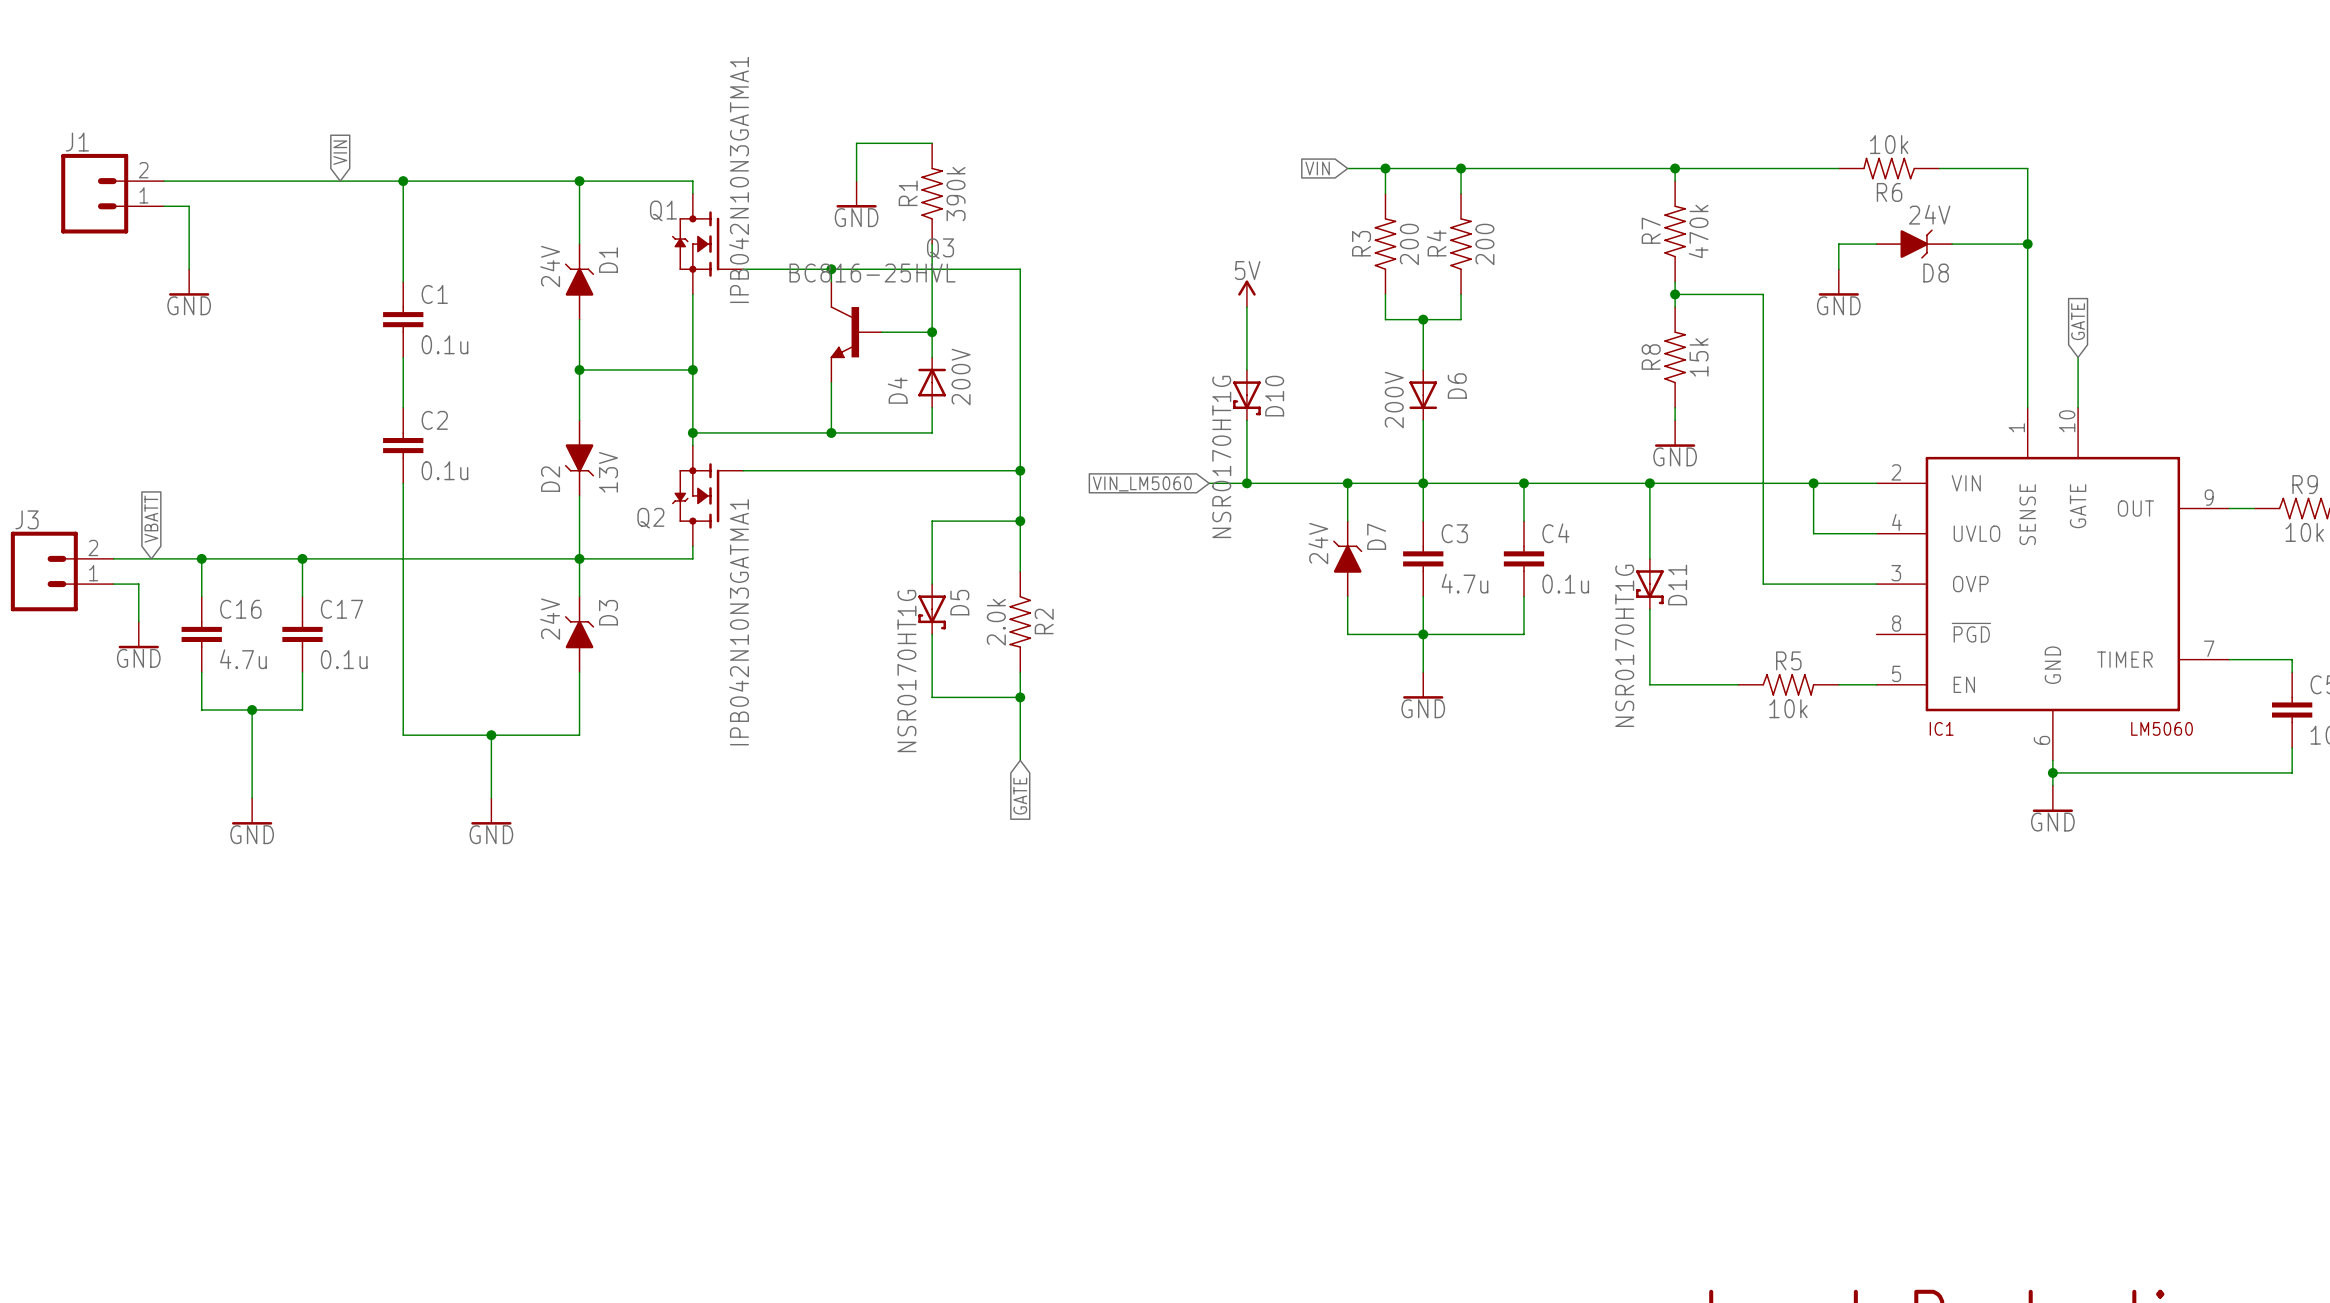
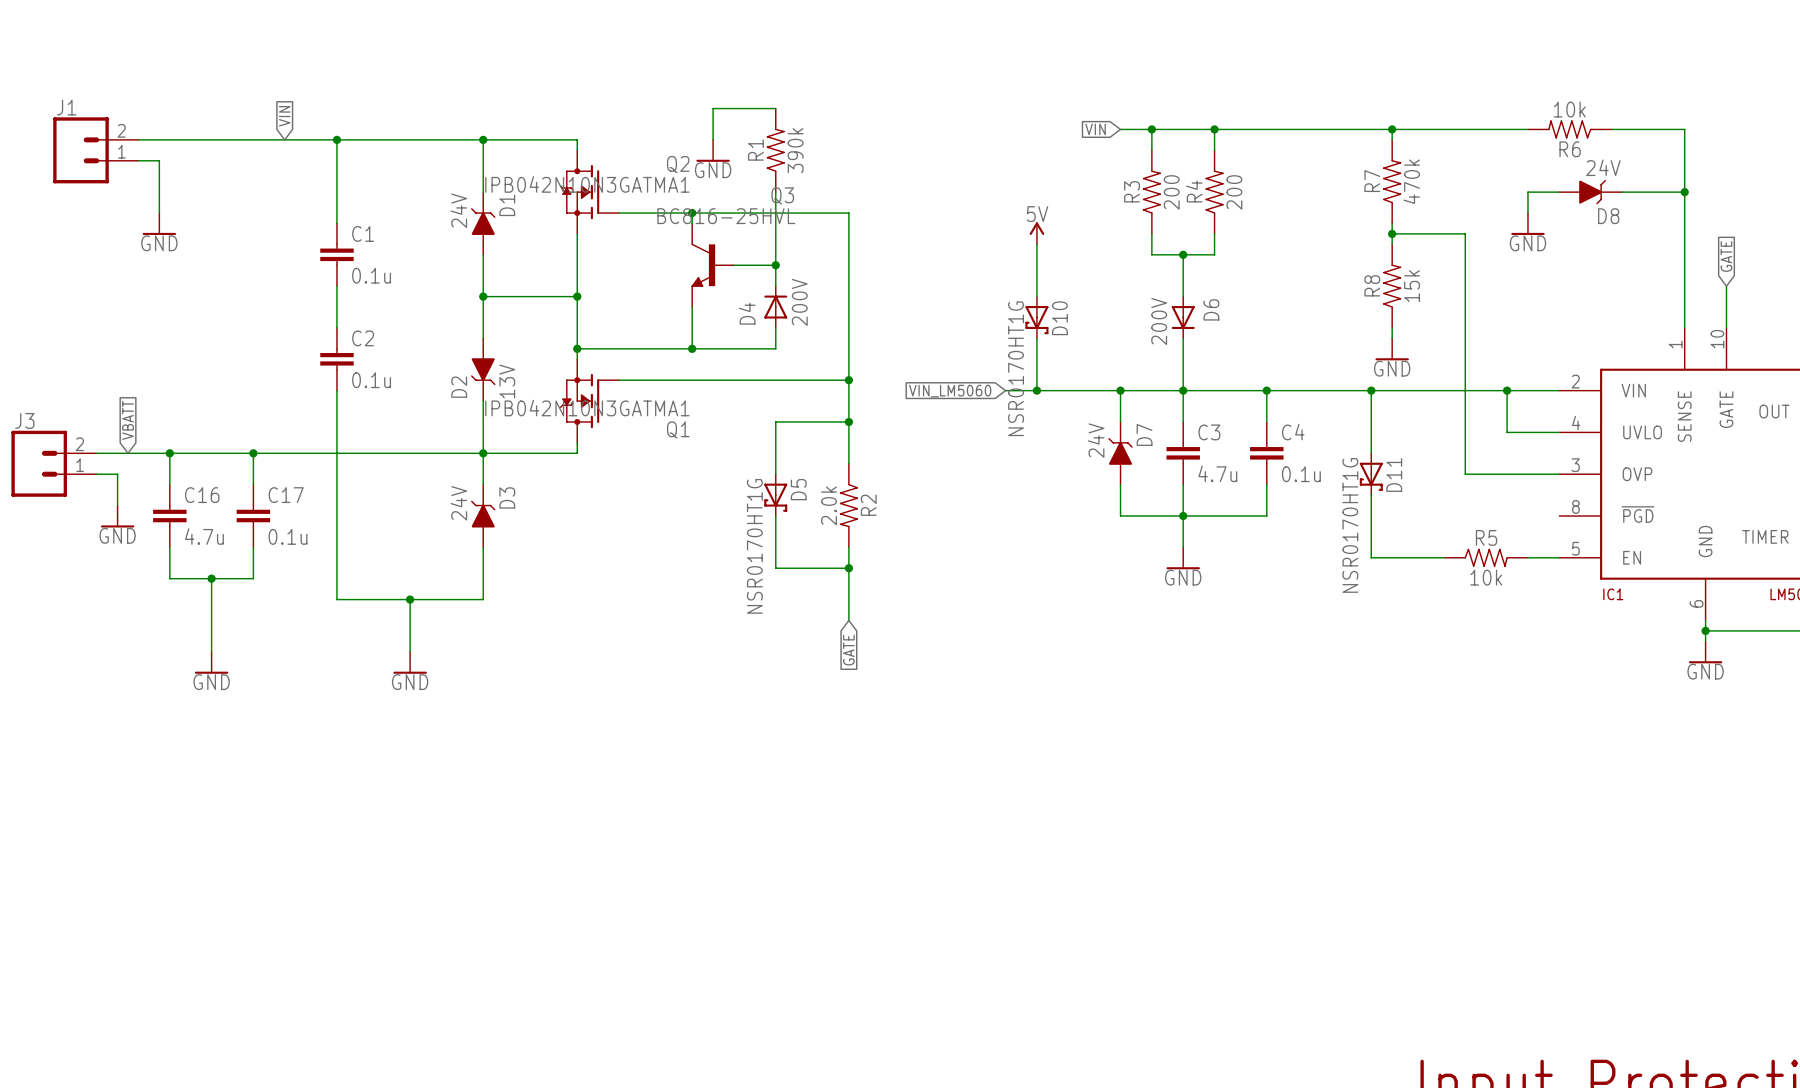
Q1 value rotation: 0° (739, 179) -> 90° clockwise (587, 184)
Q1 name: Q1 (663, 210) -> Q2 (678, 164)
Q2 name: Q2 (650, 518) -> Q1 (678, 429)
Q2 value rotation: 0° (739, 622) -> 90° clockwise (587, 408)

